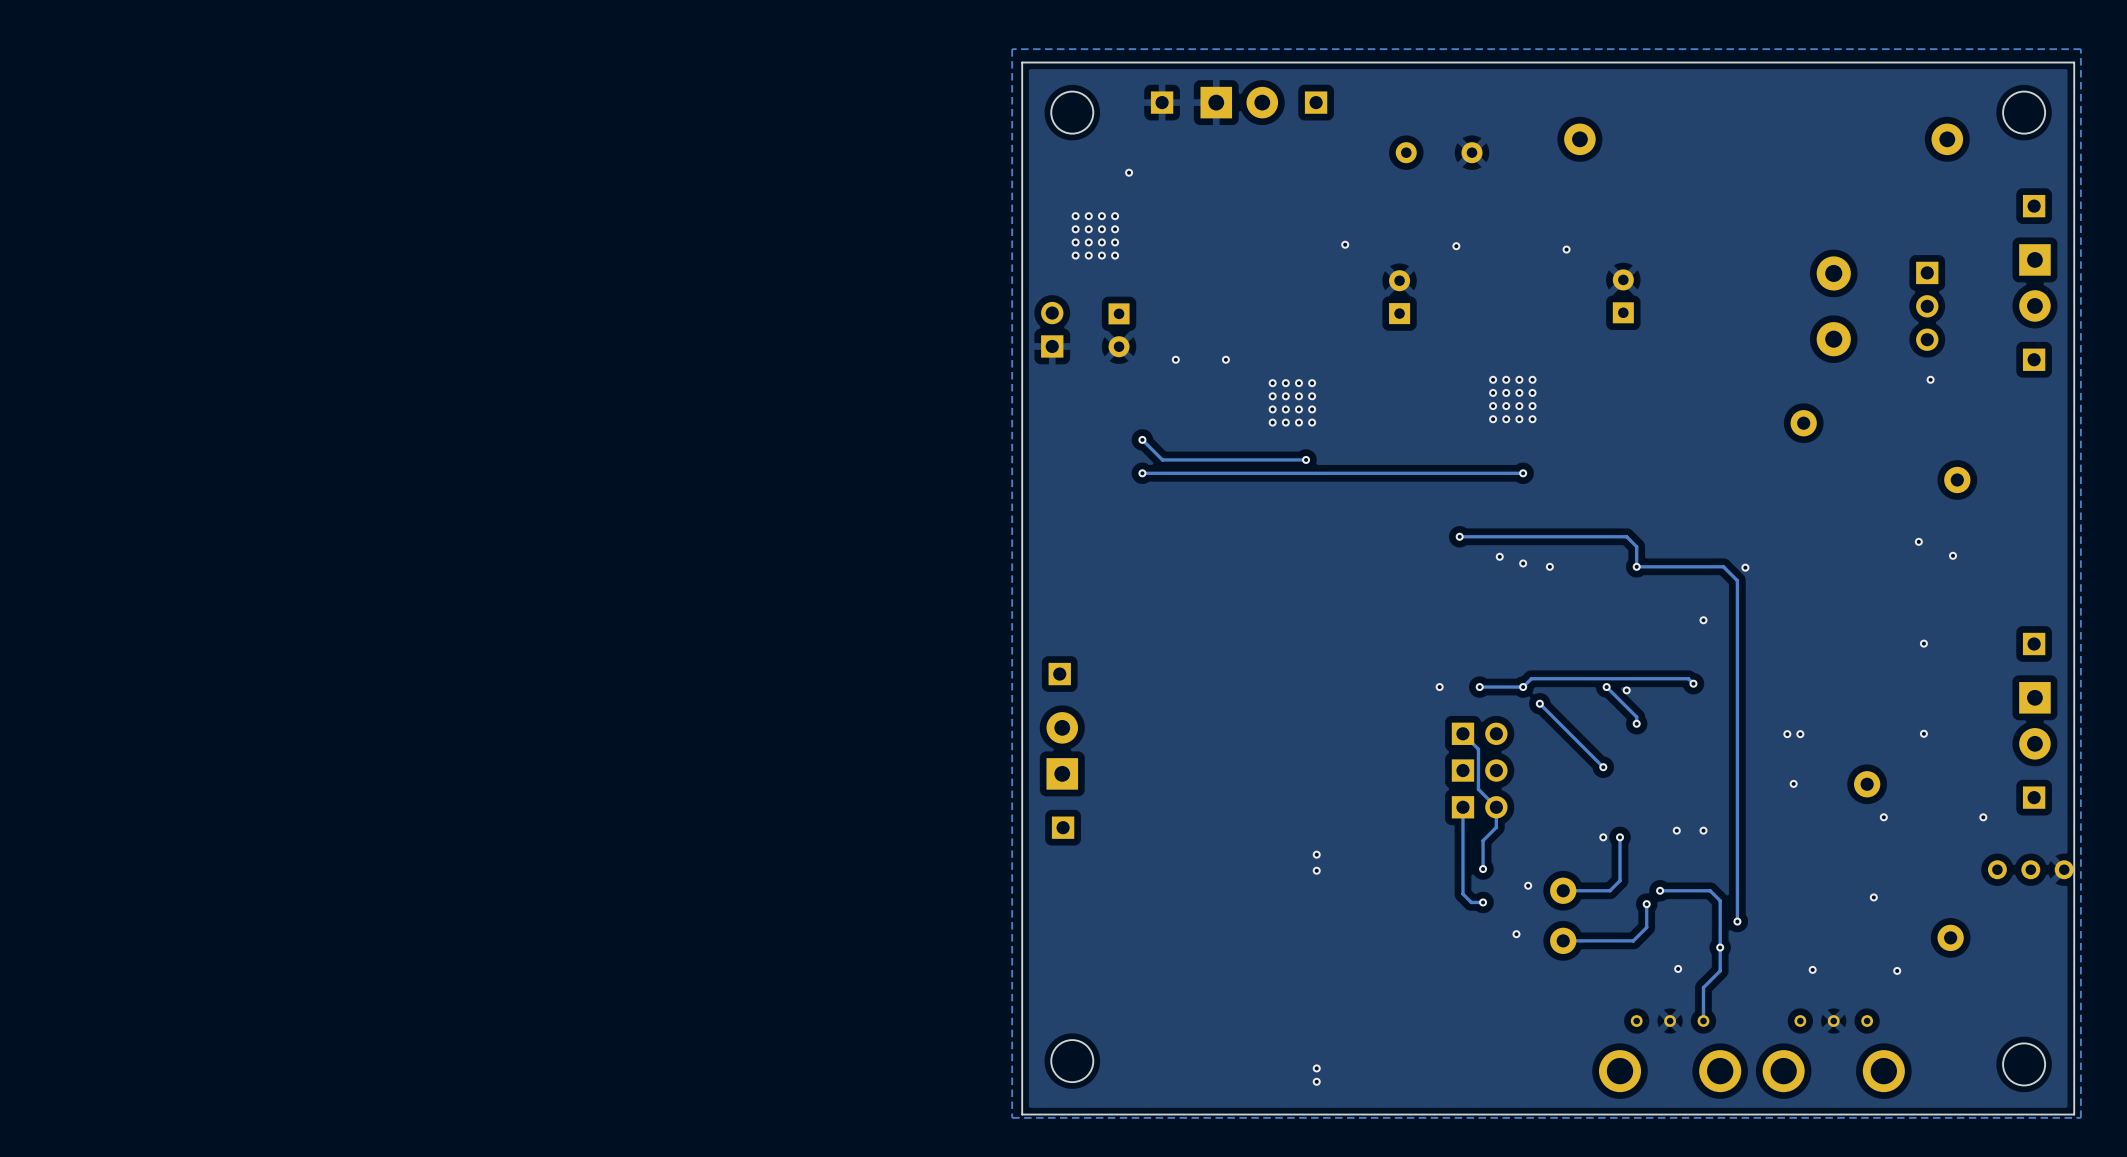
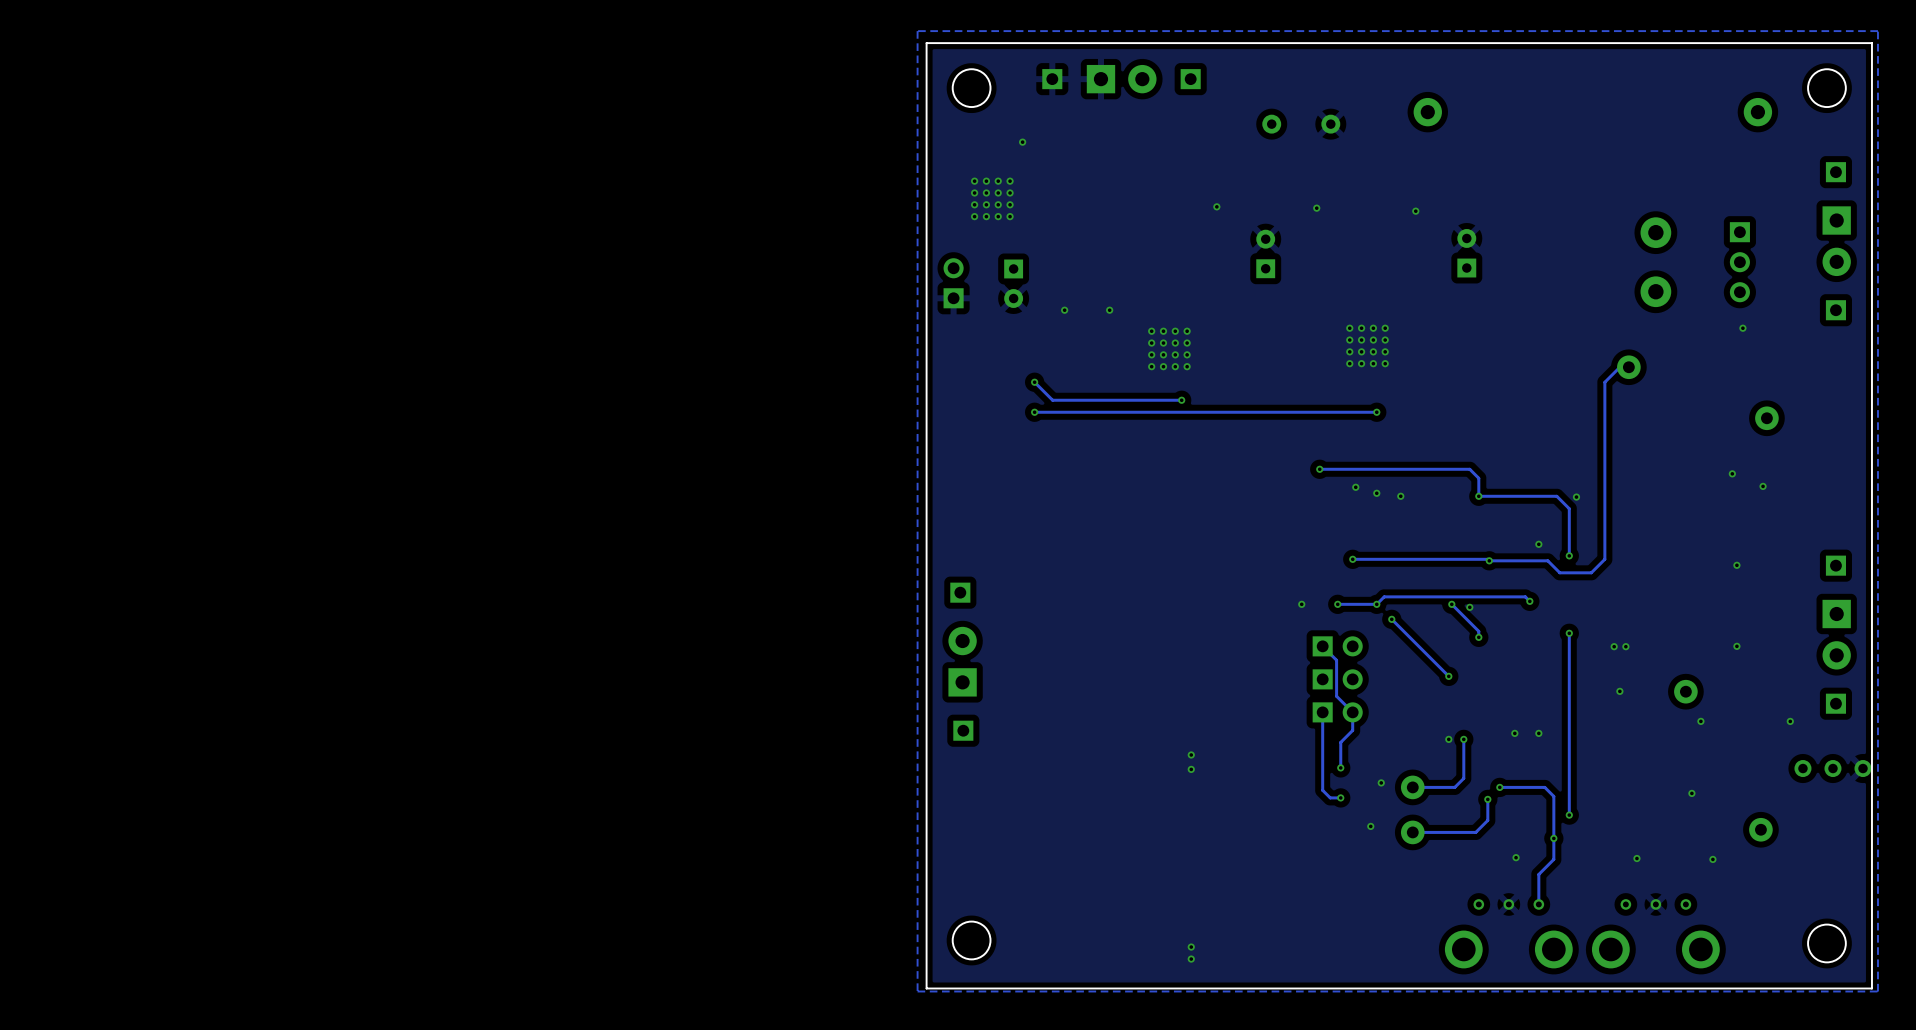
track: none -> (1628, 367) (1619, 367) (1604, 382) (1604, 559) (1591, 572) (1559, 572) (1547, 560) (1352, 559)
track: (1737, 633) (1737, 719) -> none
via: none -> (1569, 555)
via: none -> (1352, 559)
via: none -> (1489, 560)
via: none -> (1569, 633)

